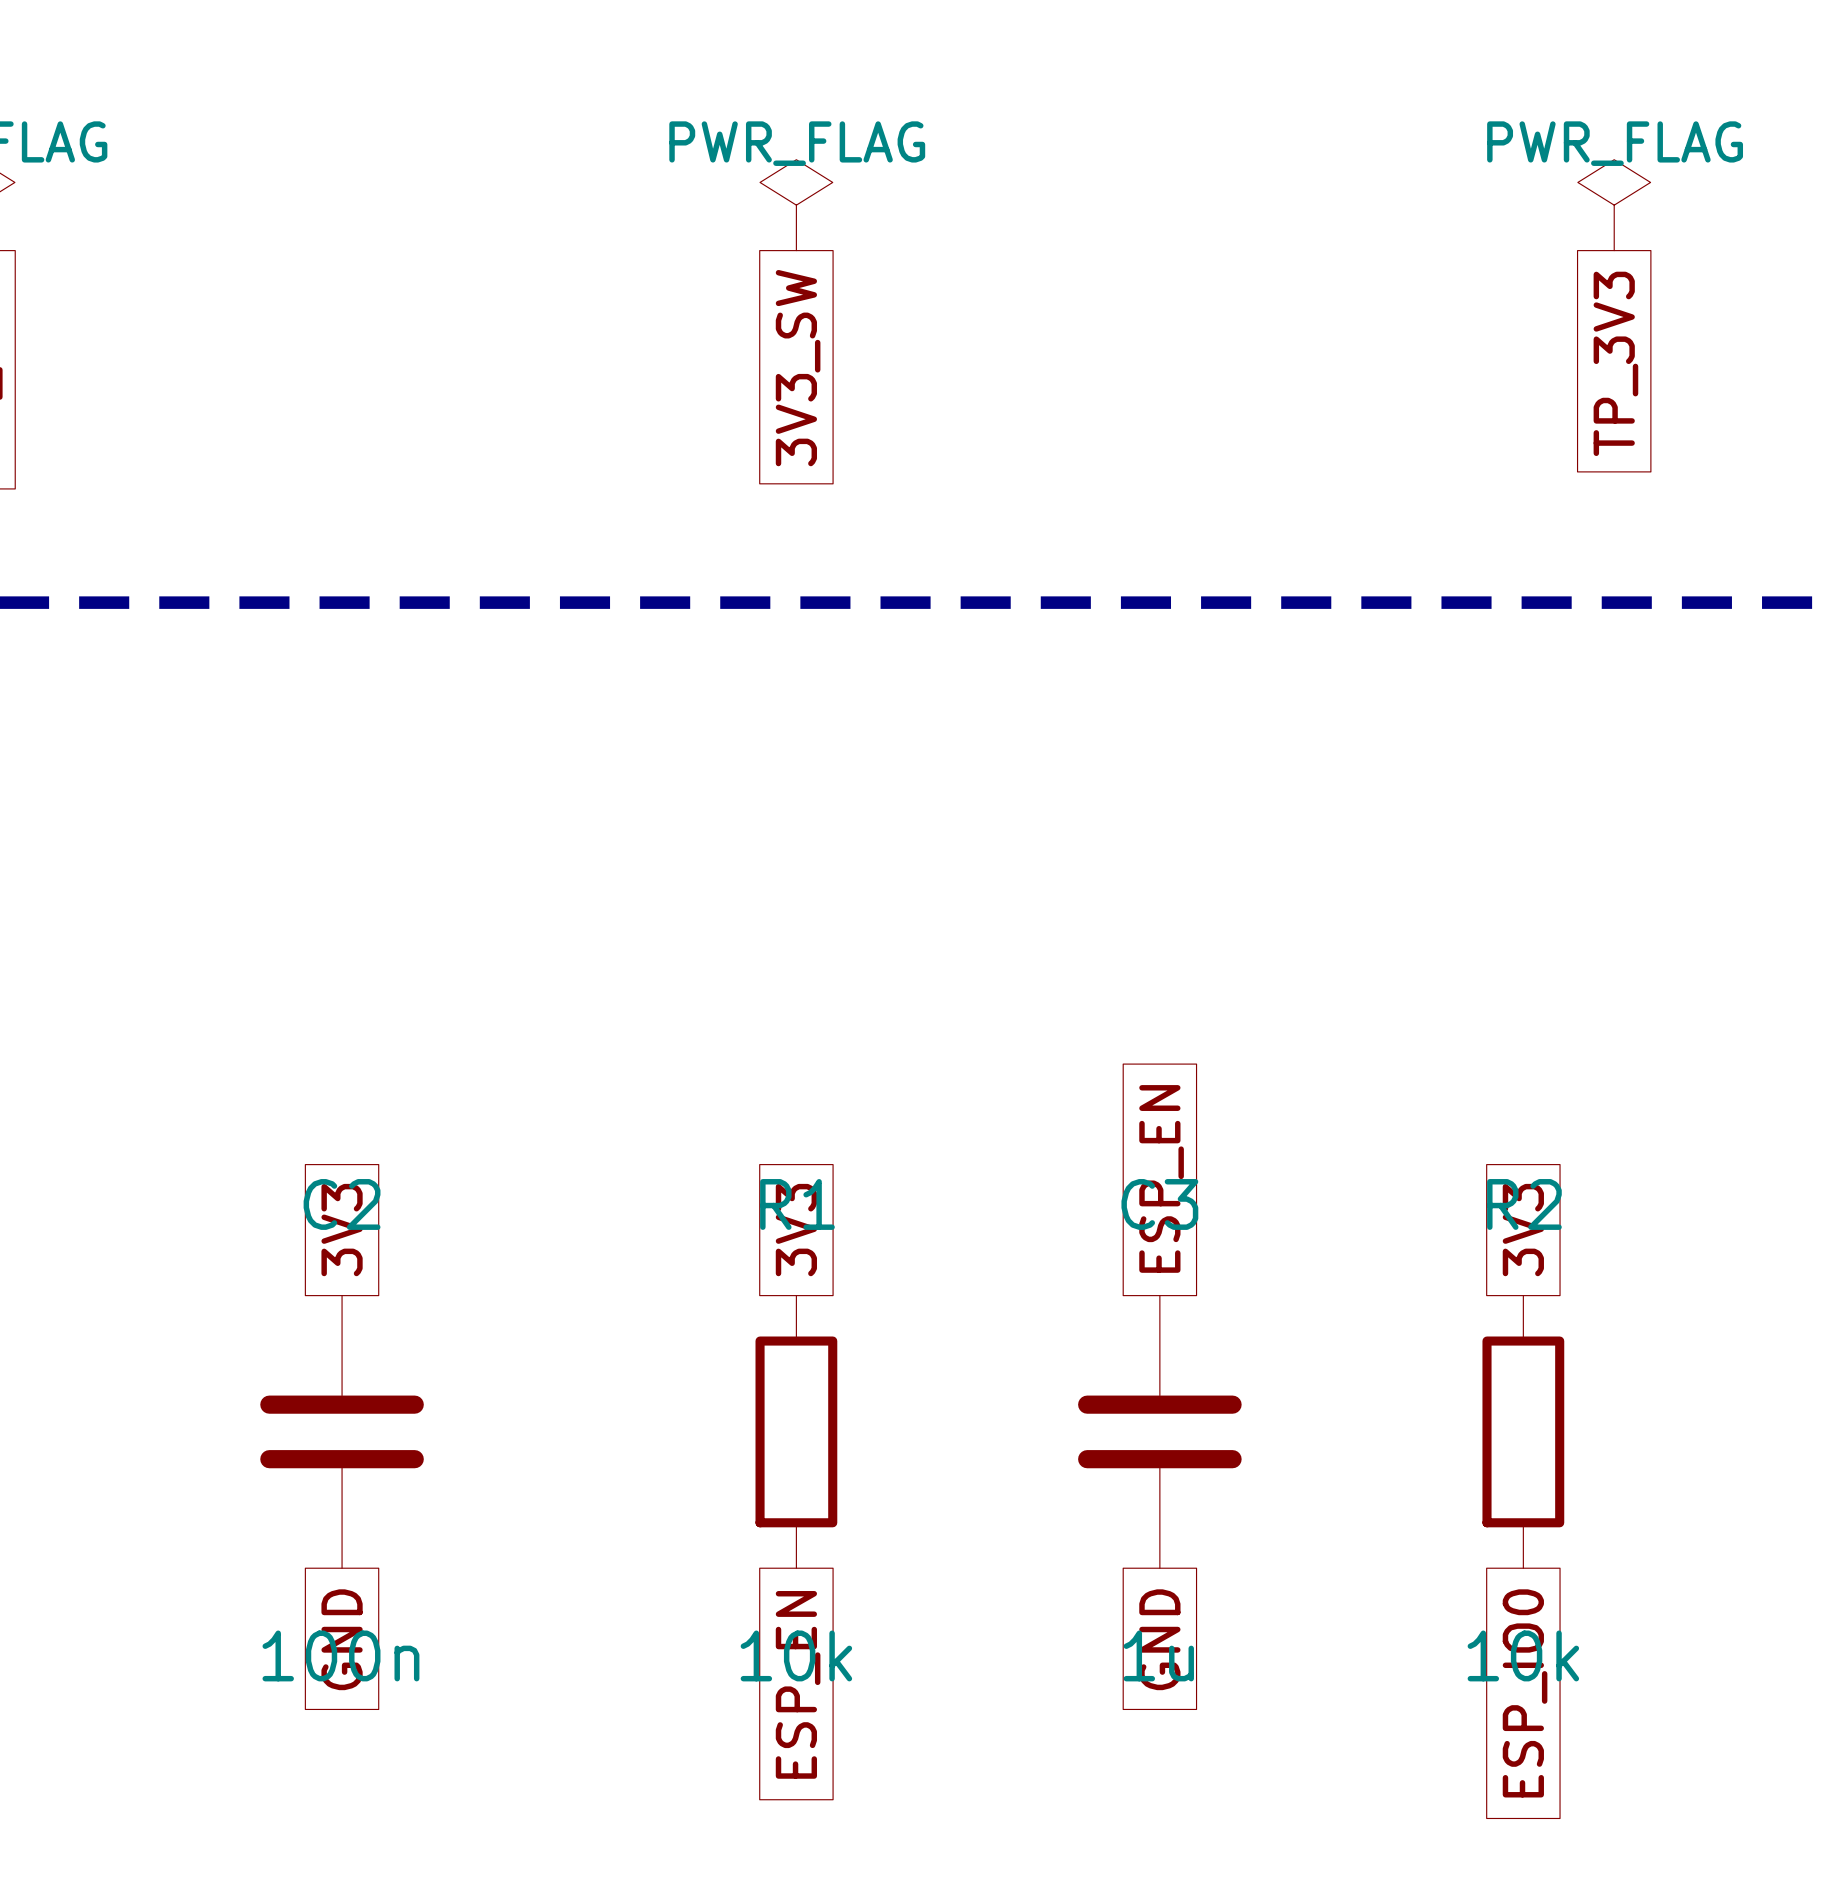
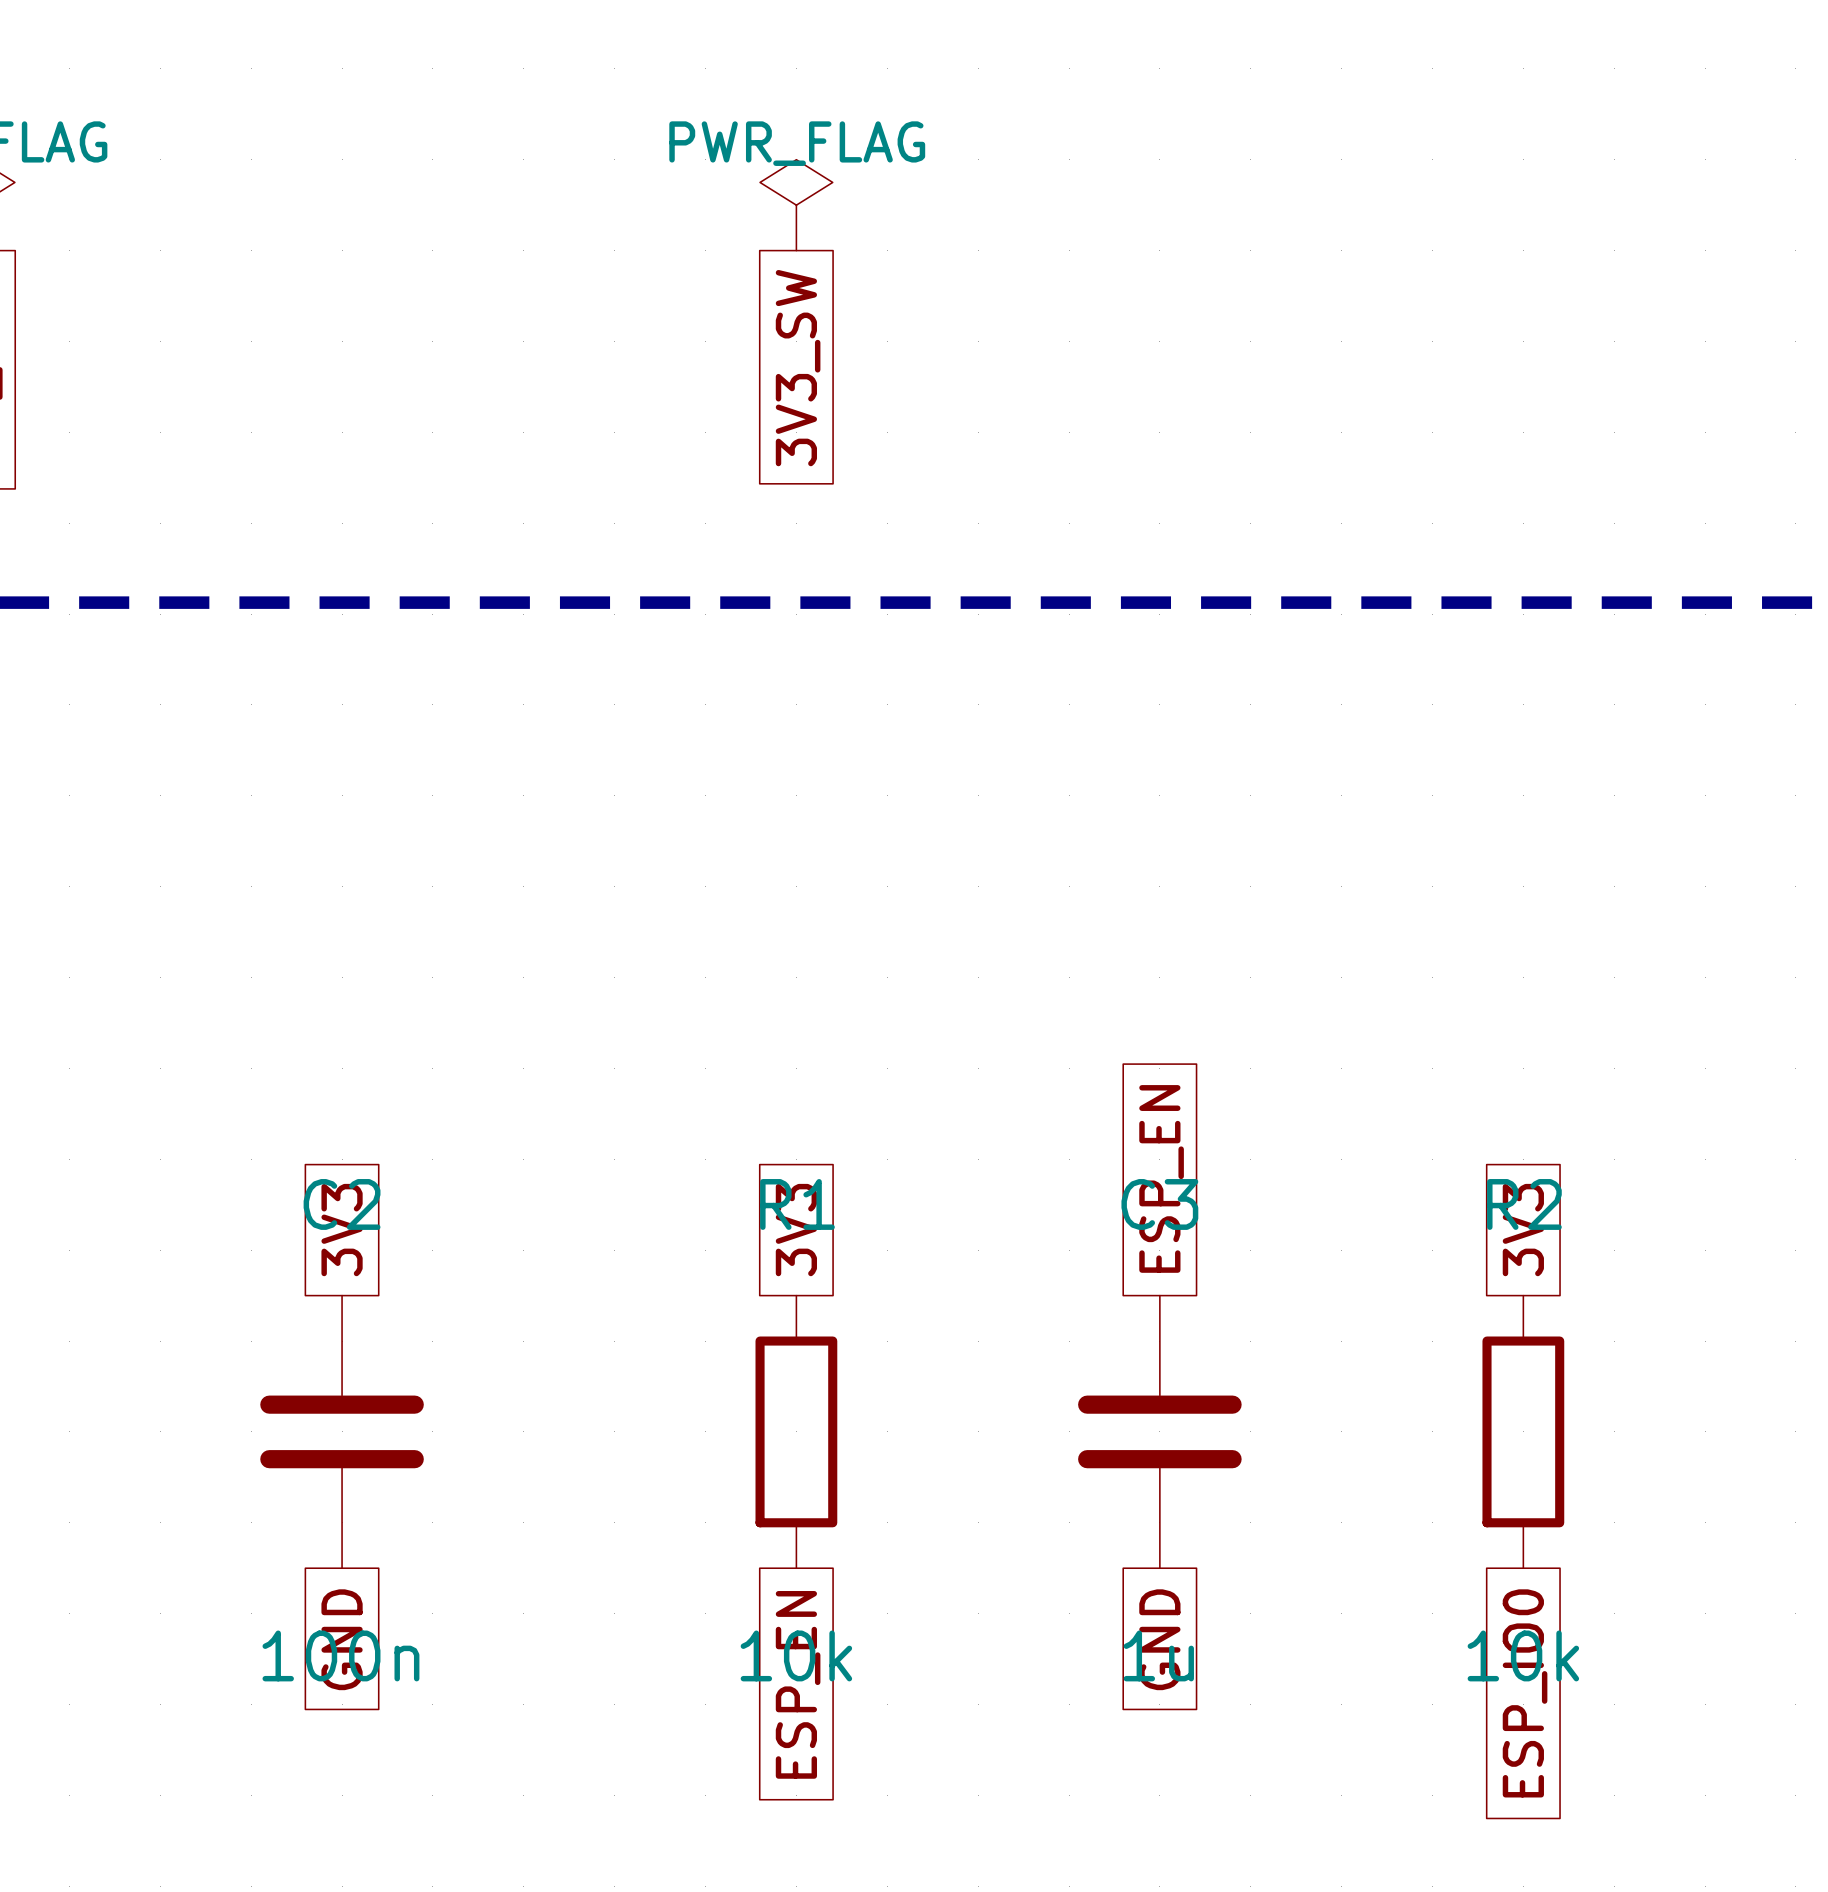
power symbol: PWR_FLAG (1614, 205) -> none
global label: TP_3V3 (1615, 363) -> none

